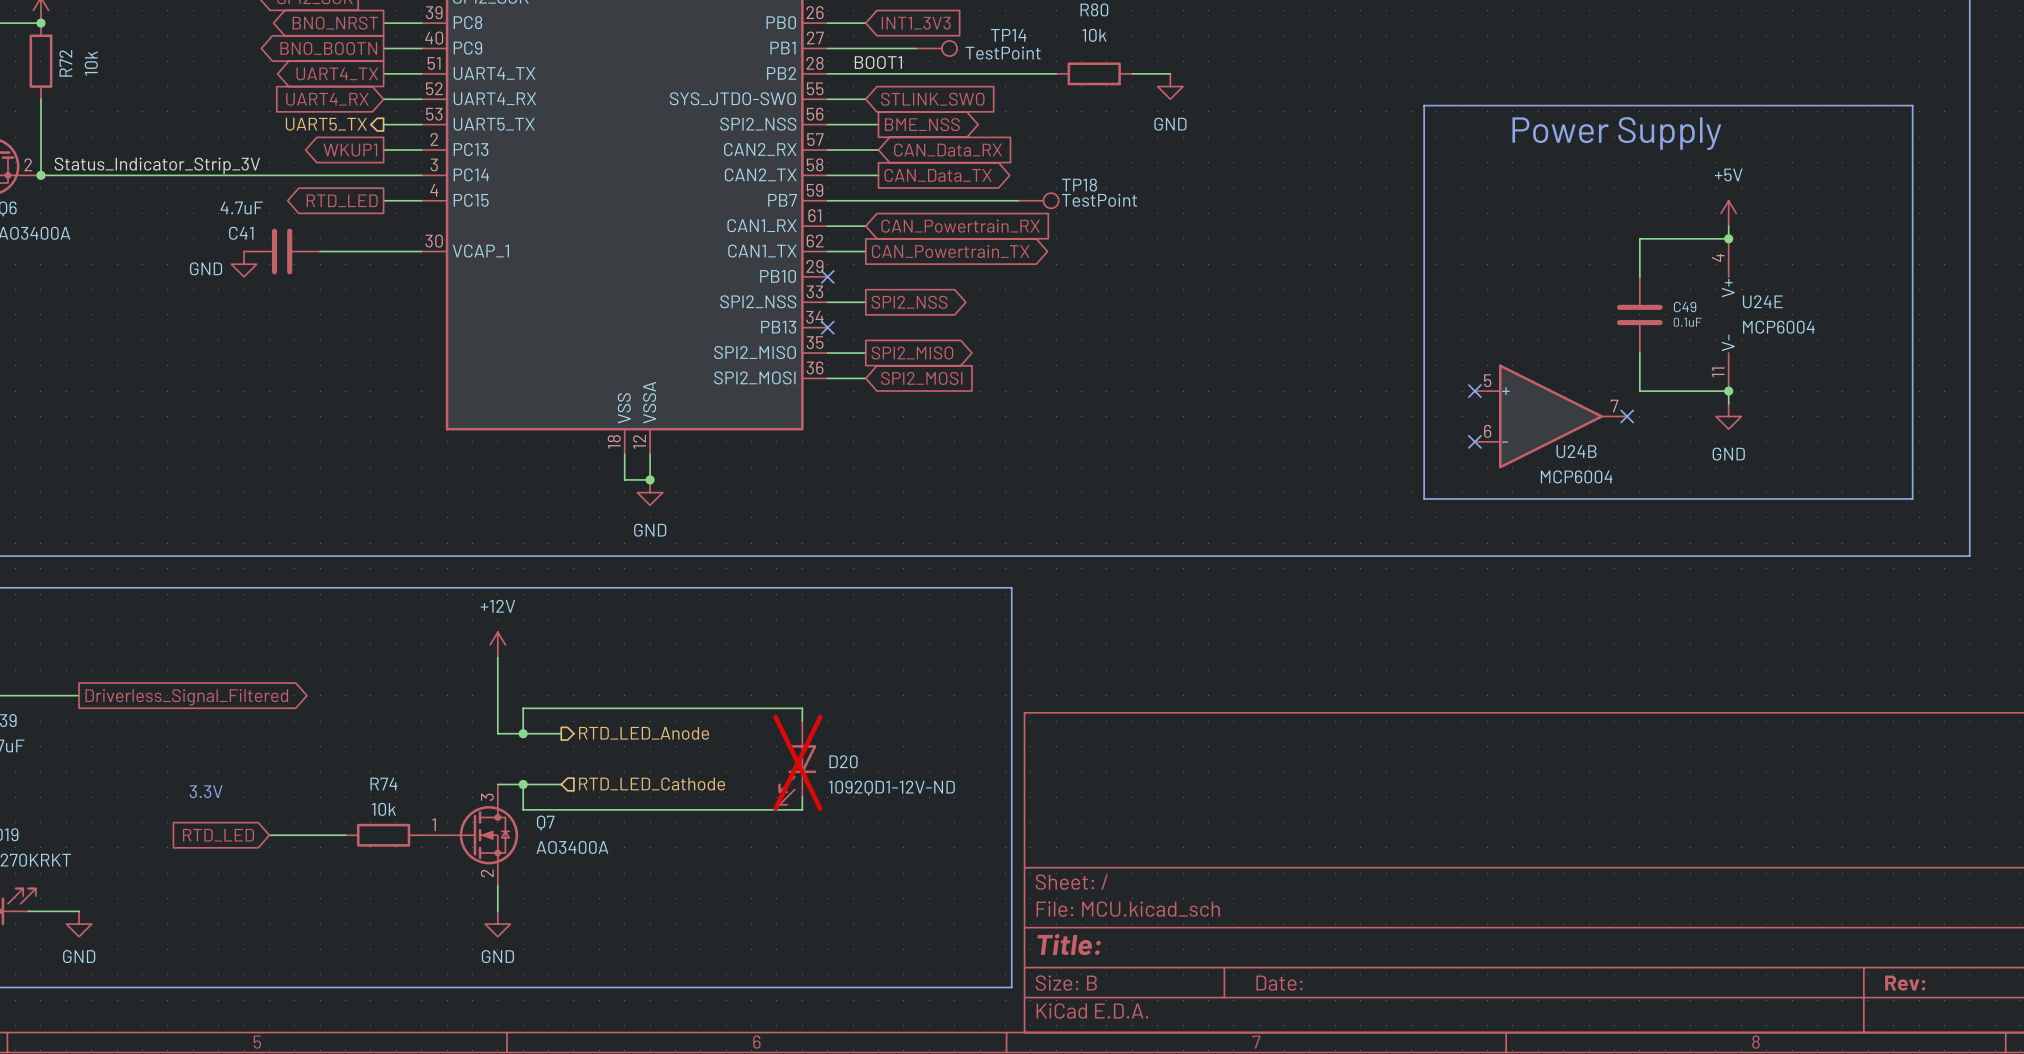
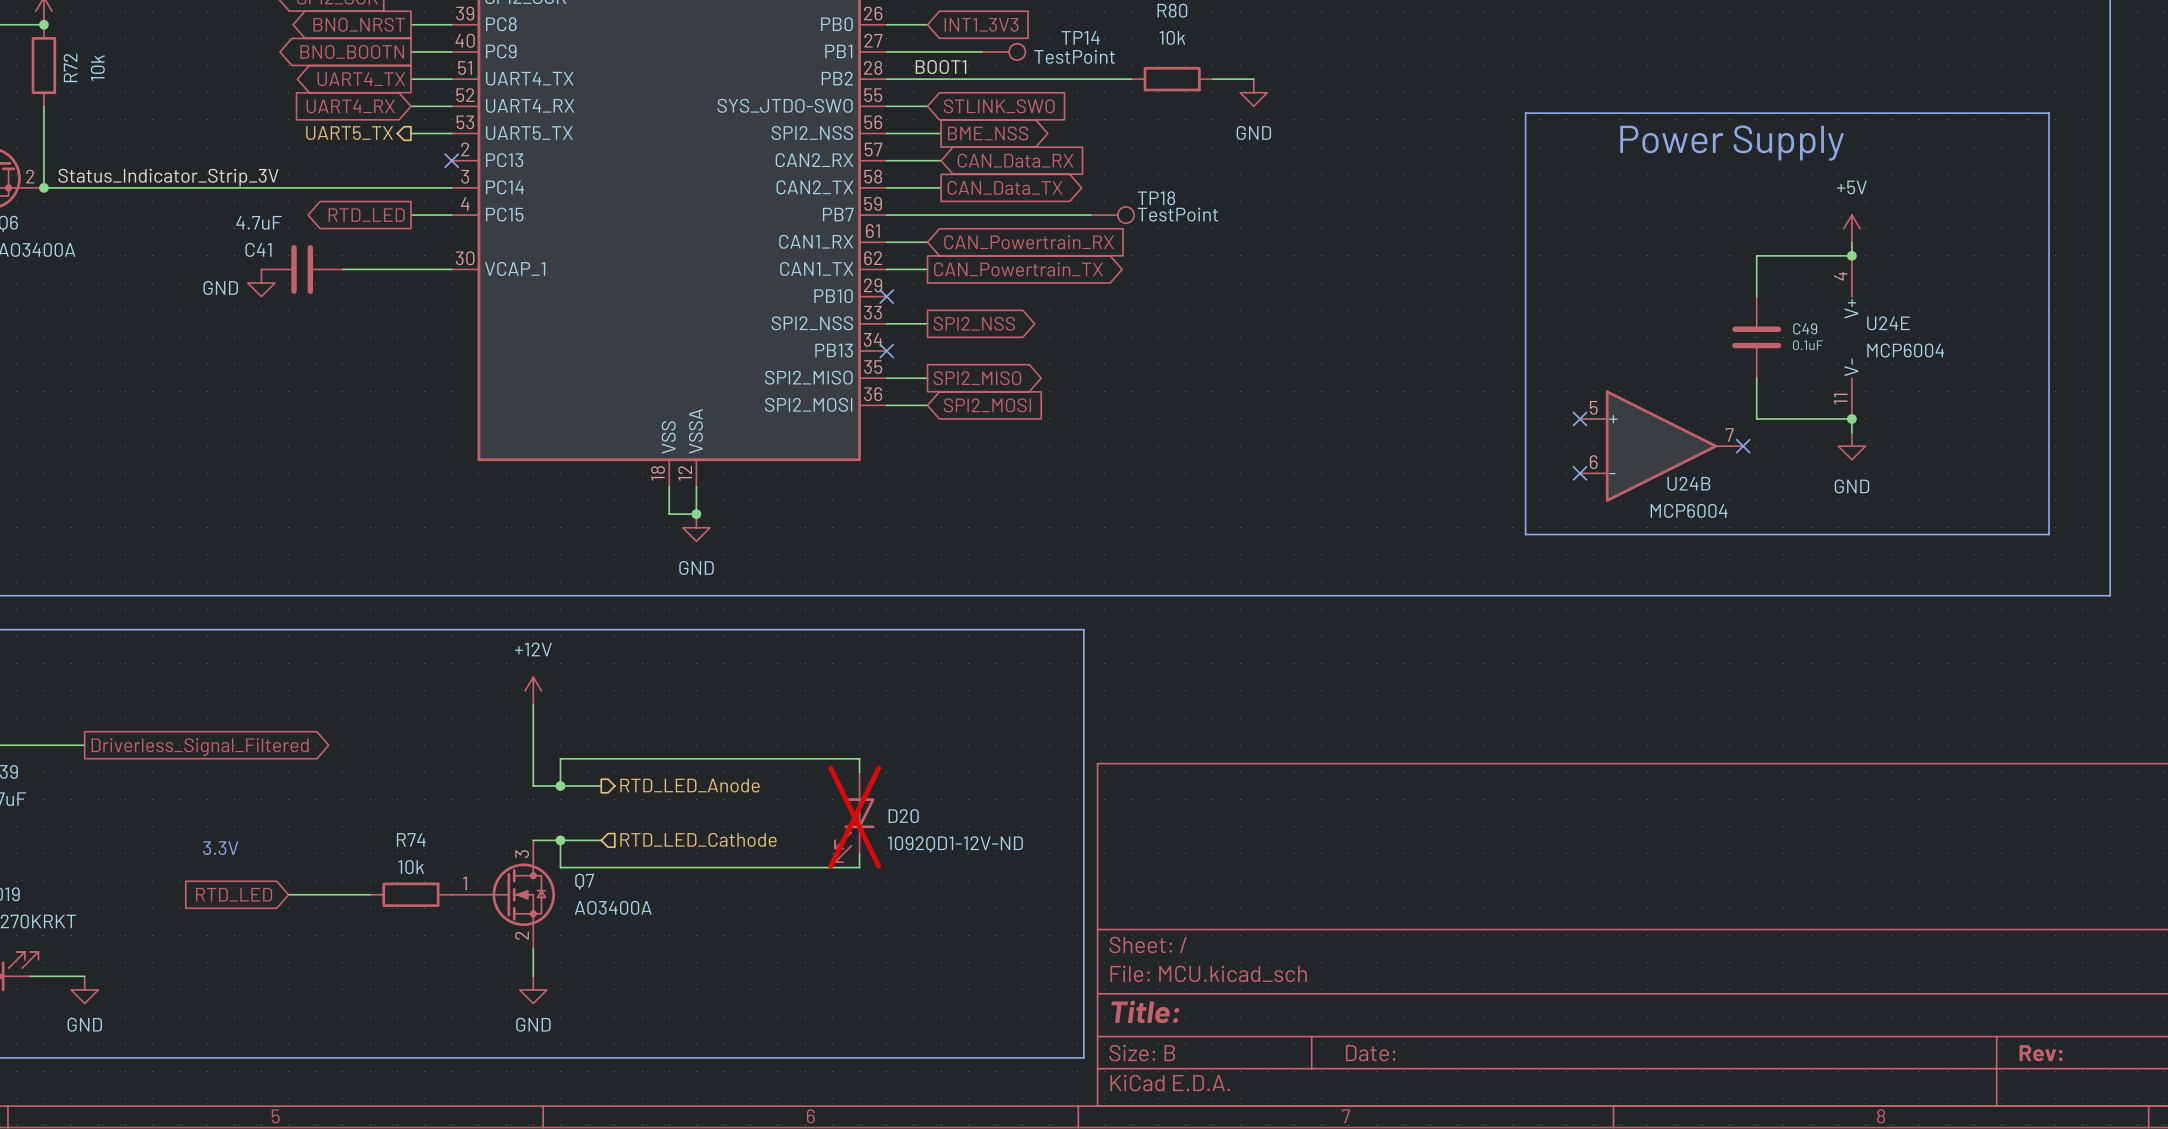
global label: WKUP1 (350, 150) -> none
wire: (383, 150) (421, 150) -> none
no-connect mark: none -> (451, 160)

